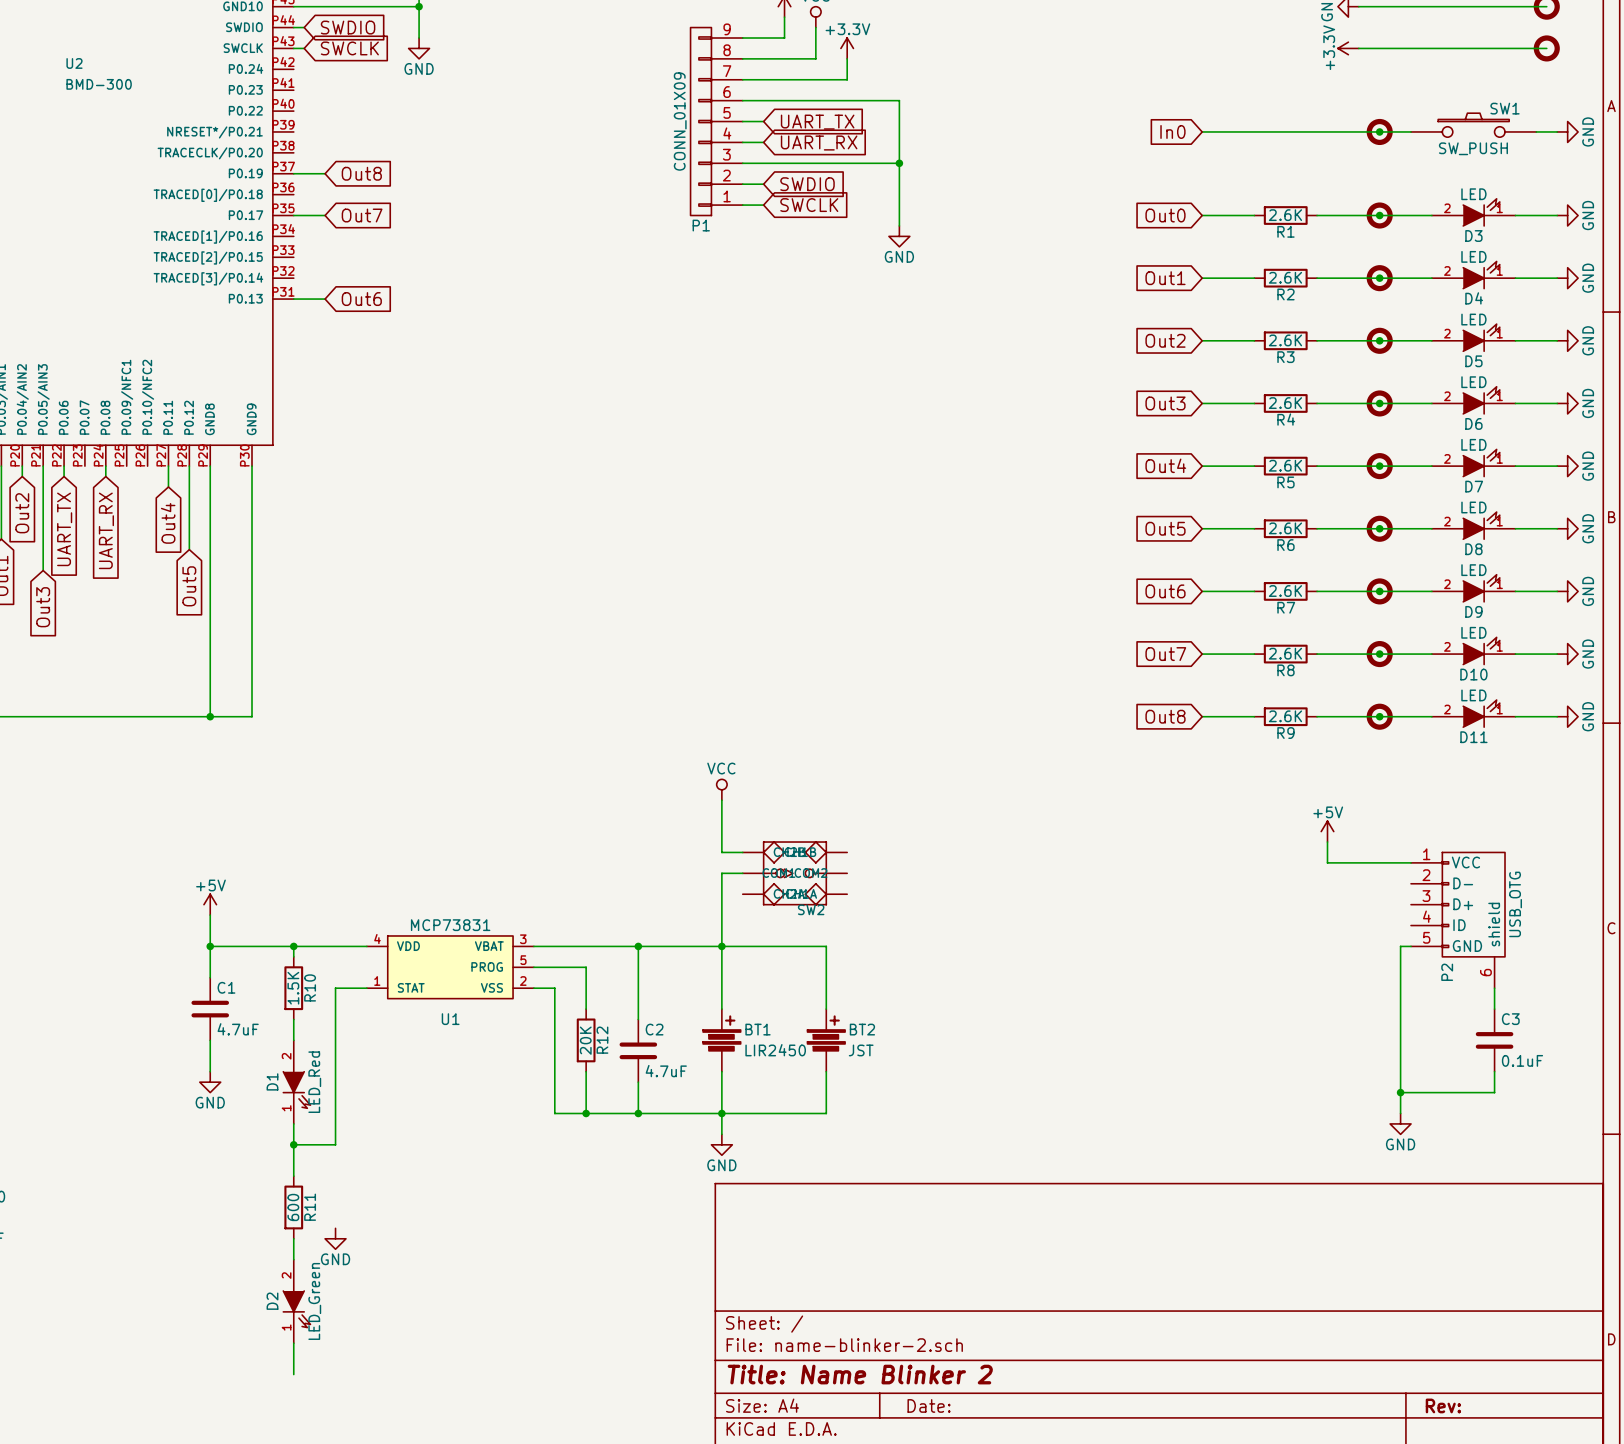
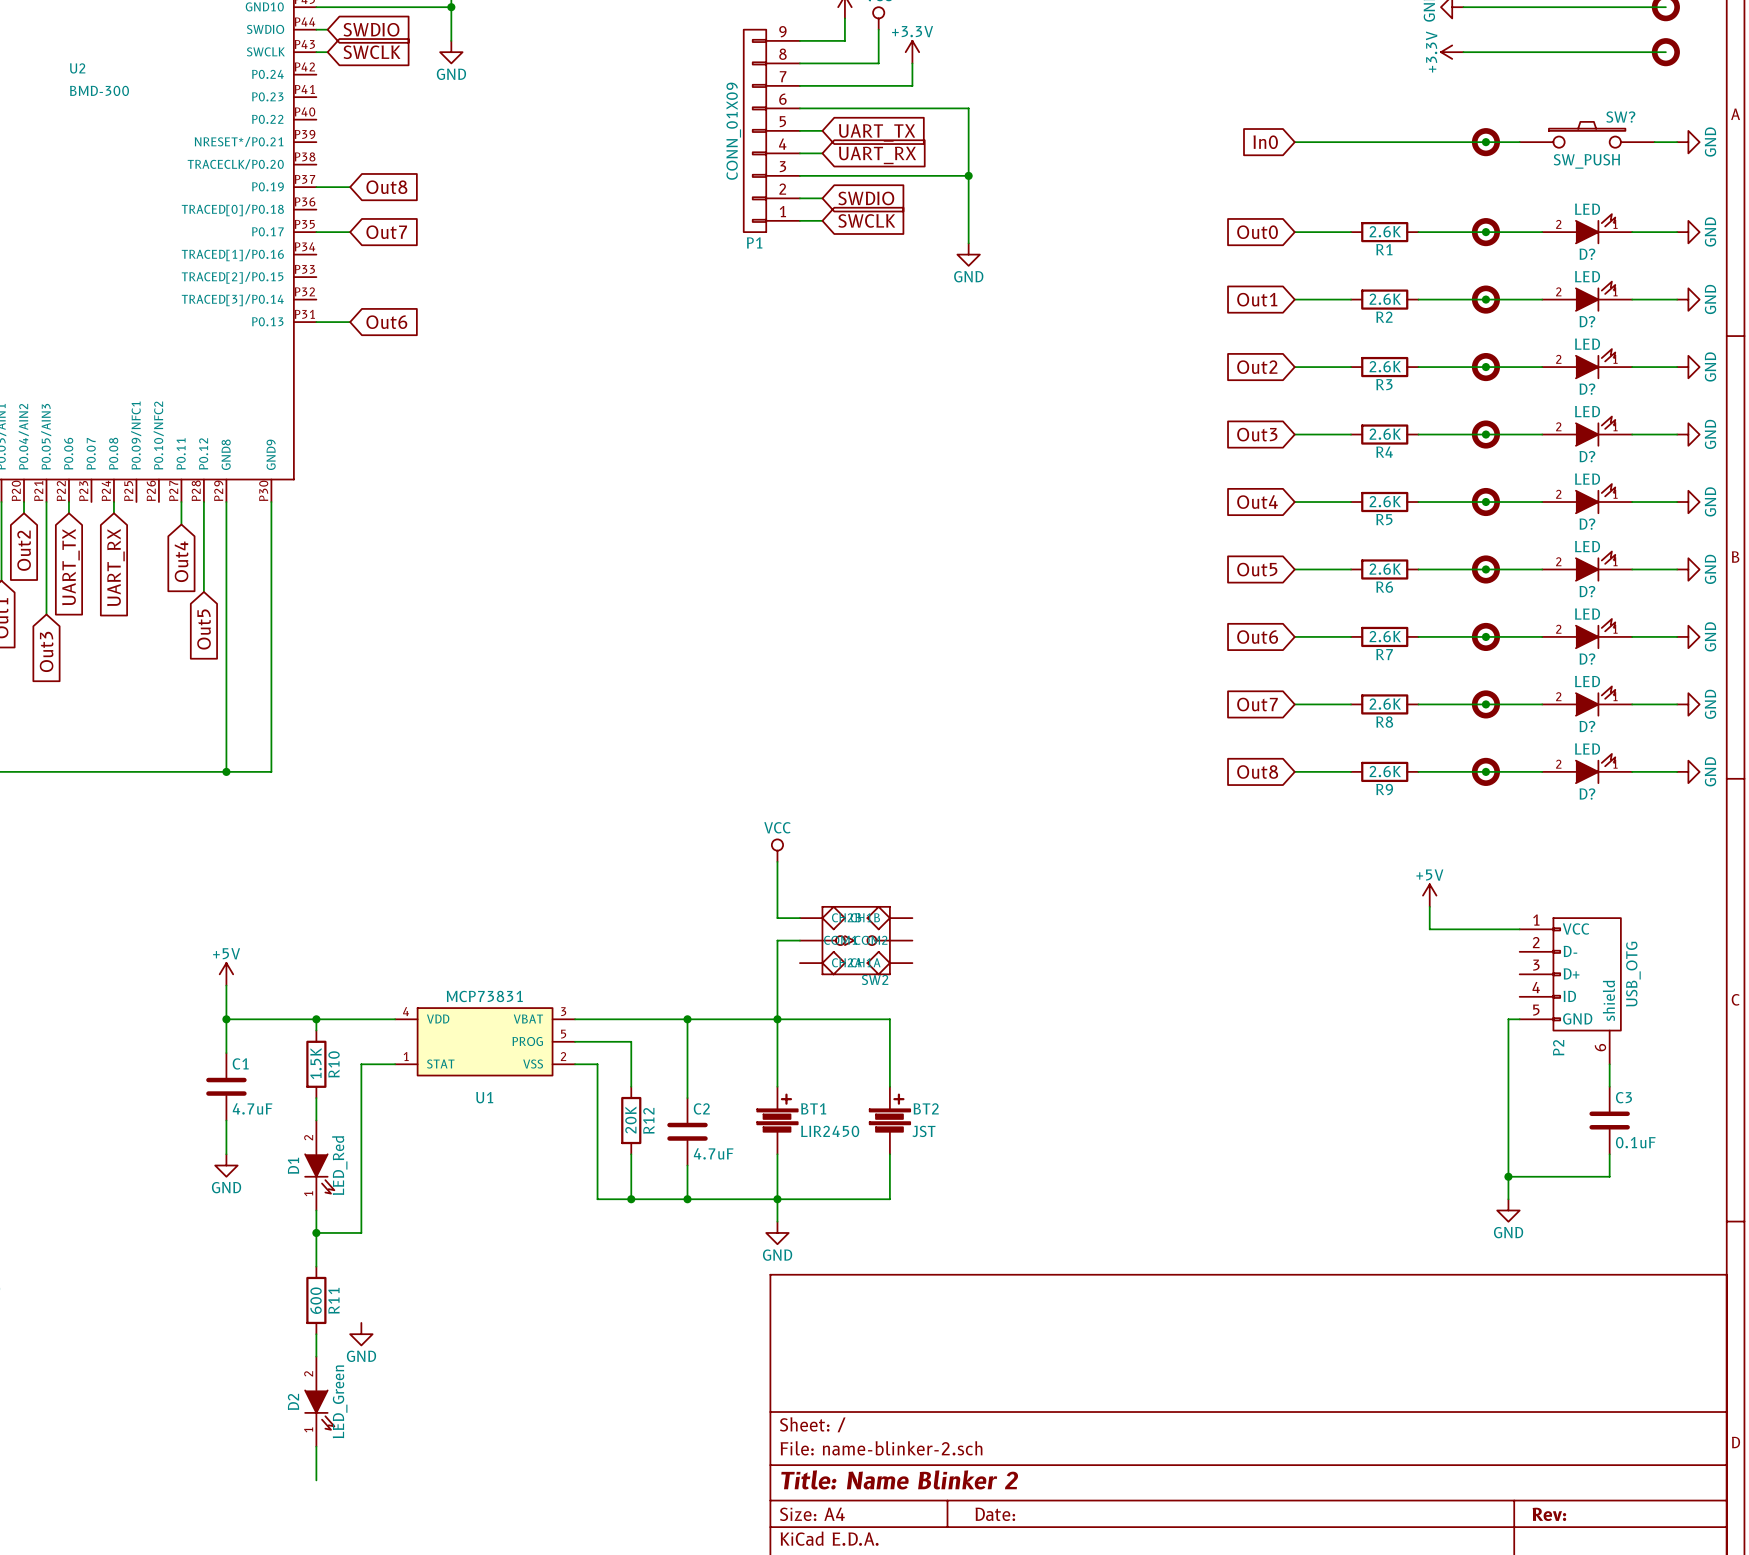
SW1 name: SW1 (1505, 108) -> SW? (1620, 117)
D3 name: D3 (1473, 236) -> D? (1587, 254)
D4 name: D4 (1474, 298) -> D? (1587, 321)
D5 name: D5 (1473, 361) -> D? (1587, 389)
D6 name: D6 (1473, 423) -> D? (1587, 456)
D7 name: D7 (1474, 486) -> D? (1587, 524)
D8 name: D8 (1473, 549) -> D? (1587, 591)
D9 name: D9 (1473, 611) -> D? (1587, 659)
D10 name: D10 (1473, 674) -> D? (1587, 726)
D11 name: D11 (1473, 737) -> D? (1587, 794)

